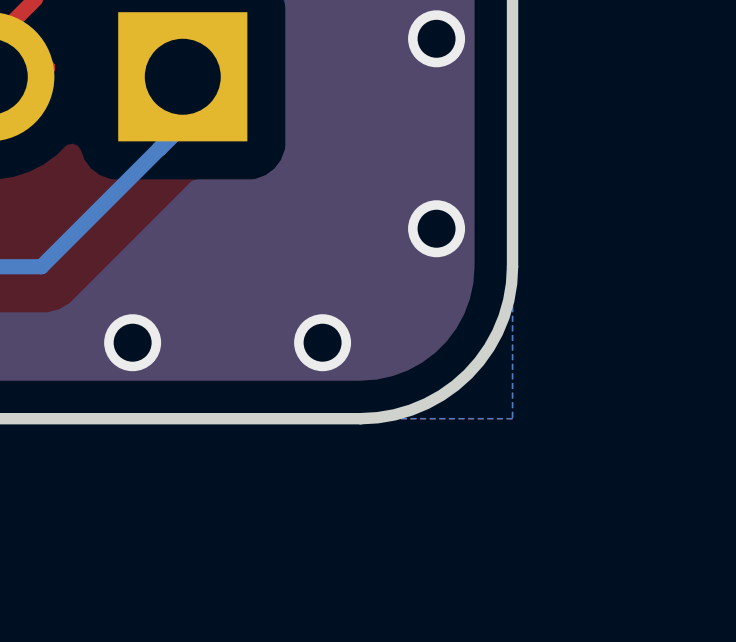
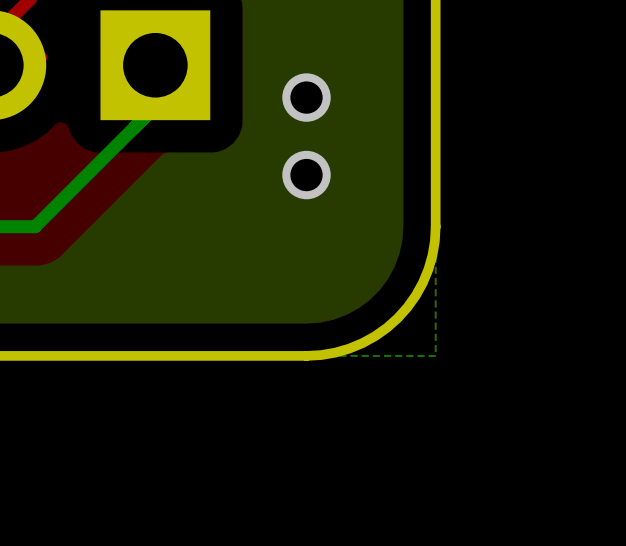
via: (436, 38) -> none
via: none -> (306, 97)
via: none -> (306, 175)
via: (436, 228) -> none
via: (132, 342) -> none
via: (322, 342) -> none

